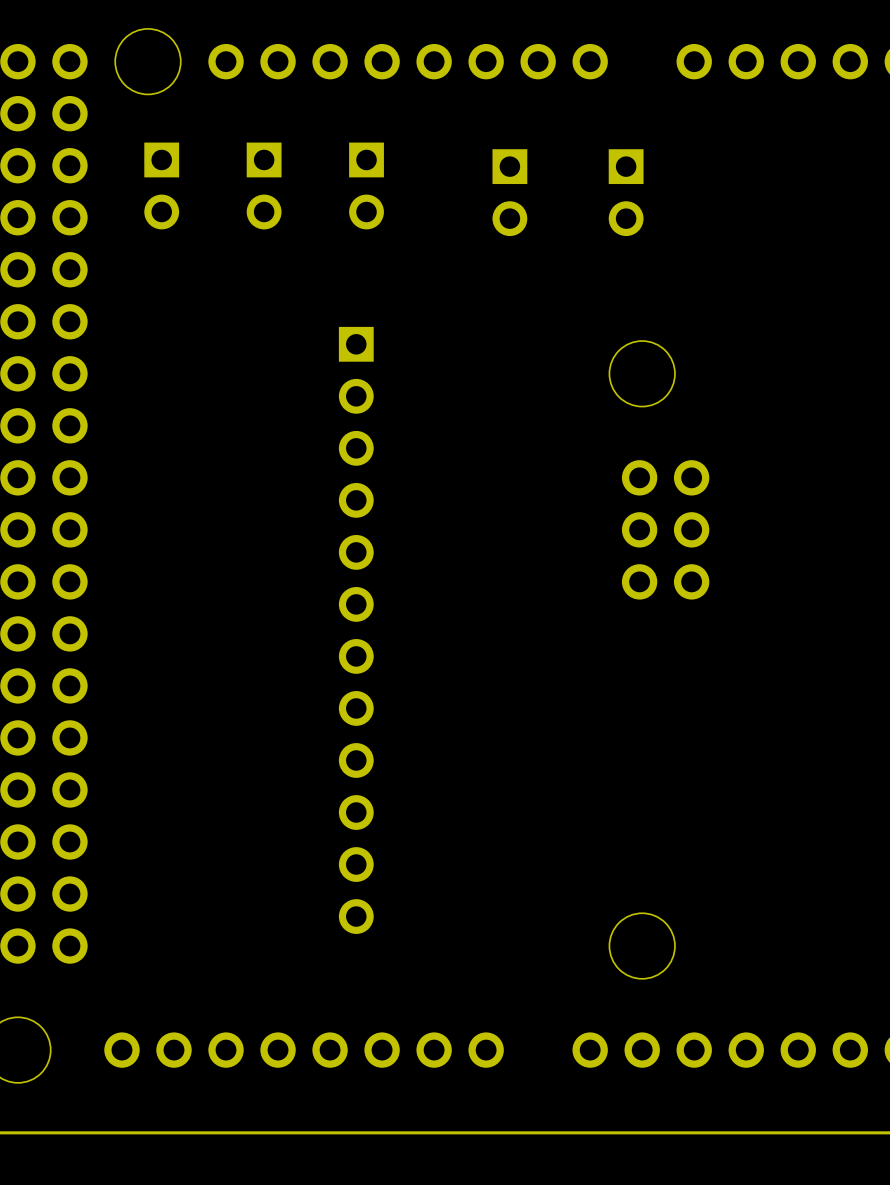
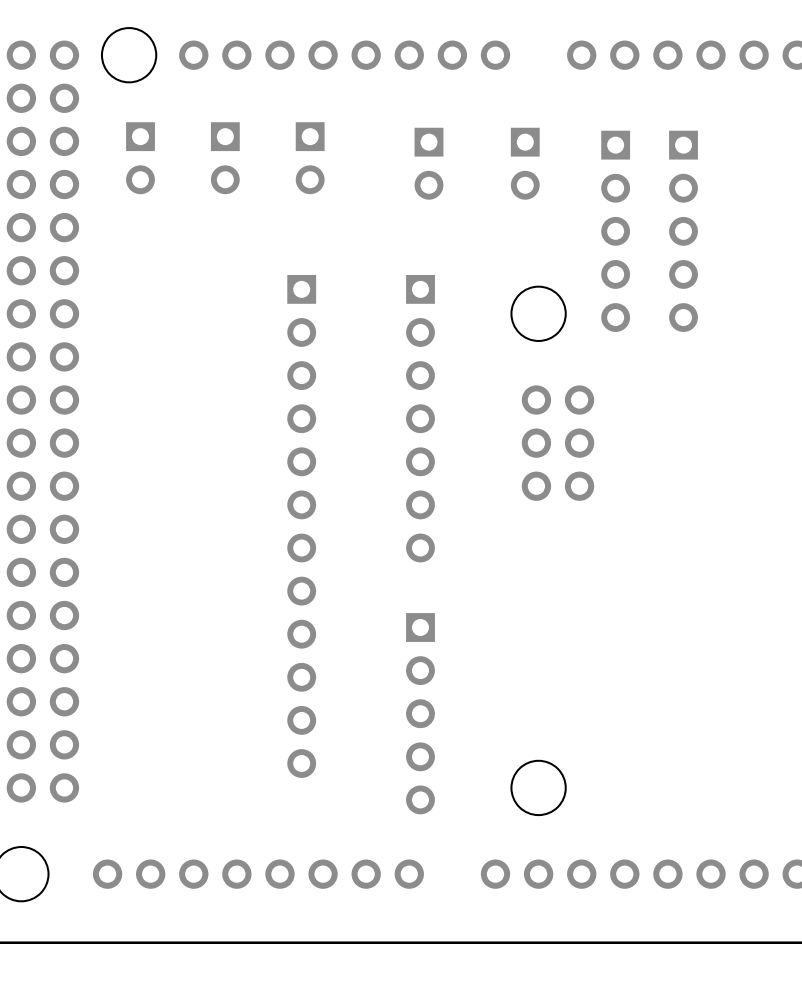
part: none -> (615, 231)
part: none -> (683, 231)
part: none -> (420, 418)
part: none -> (420, 713)

